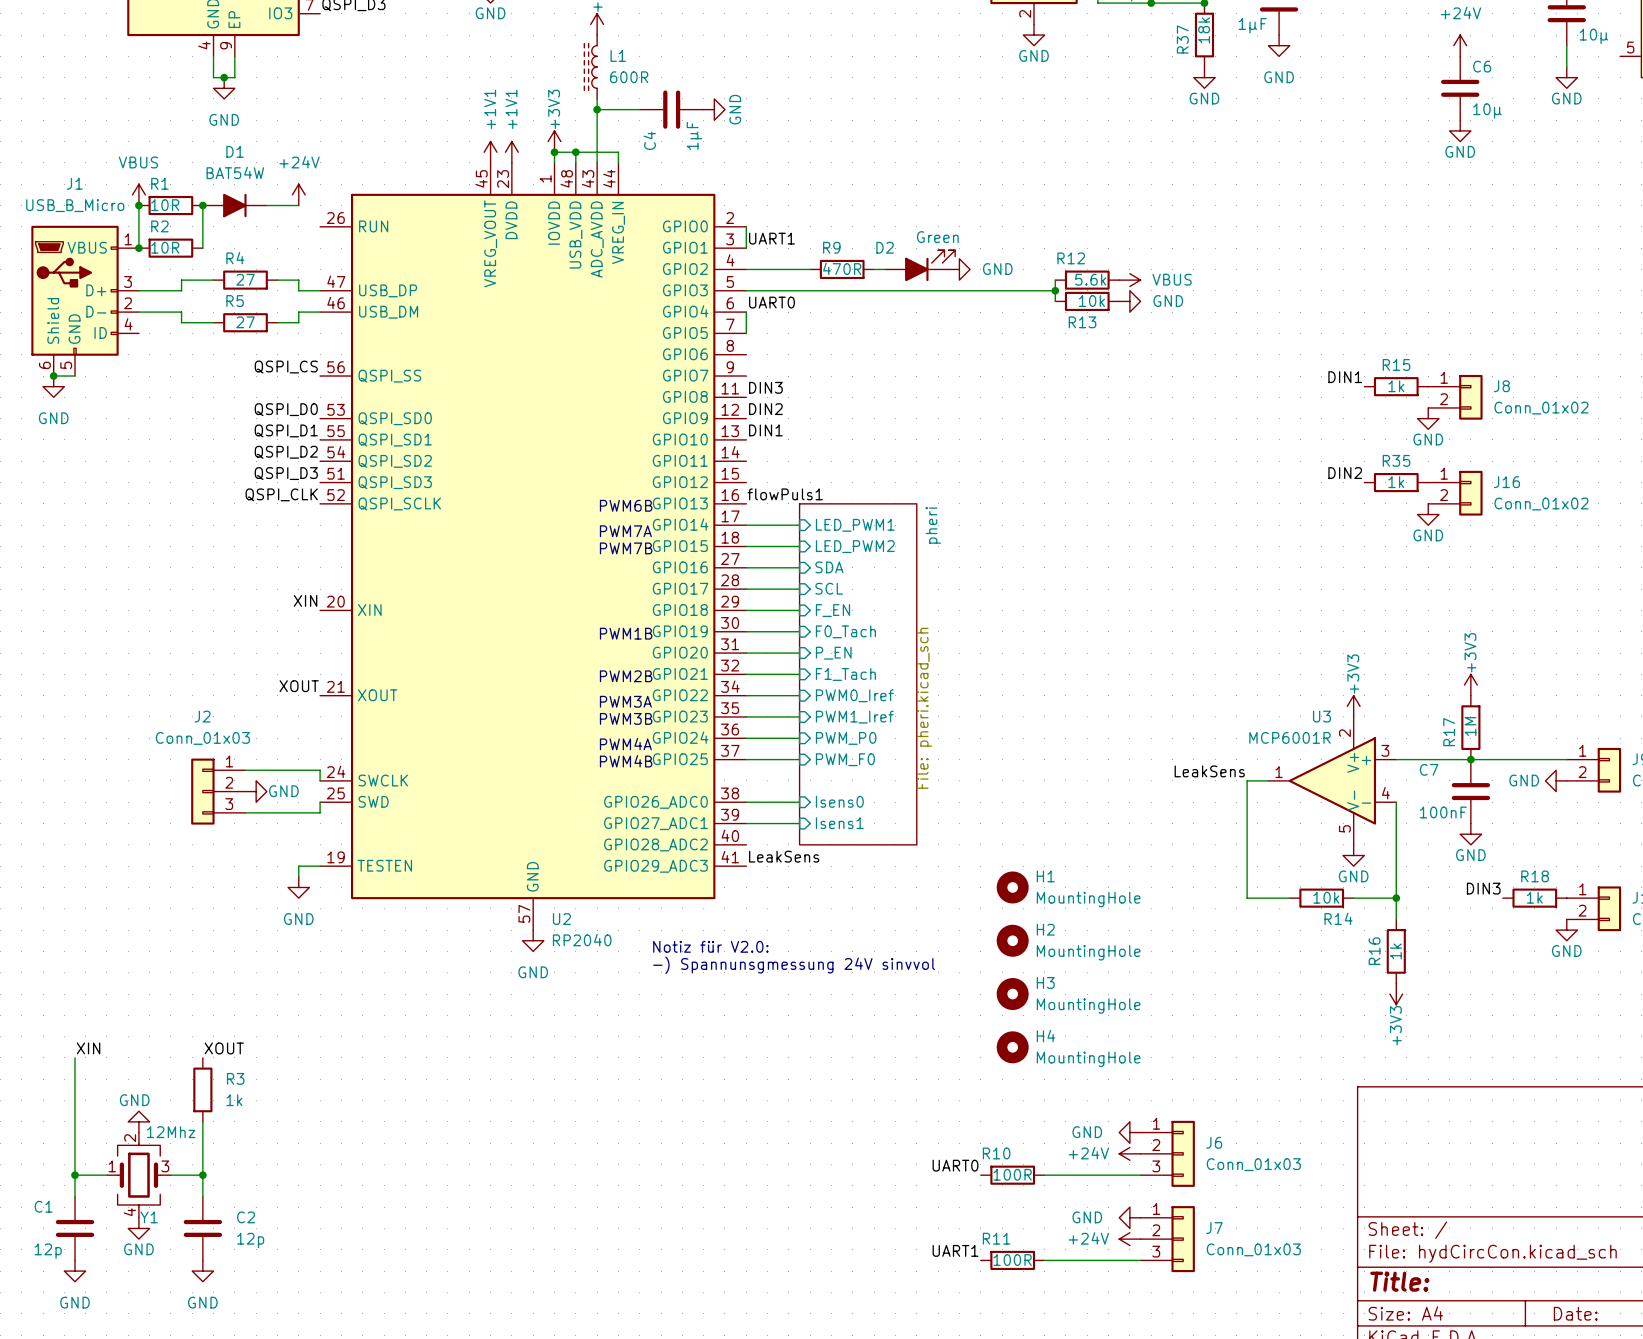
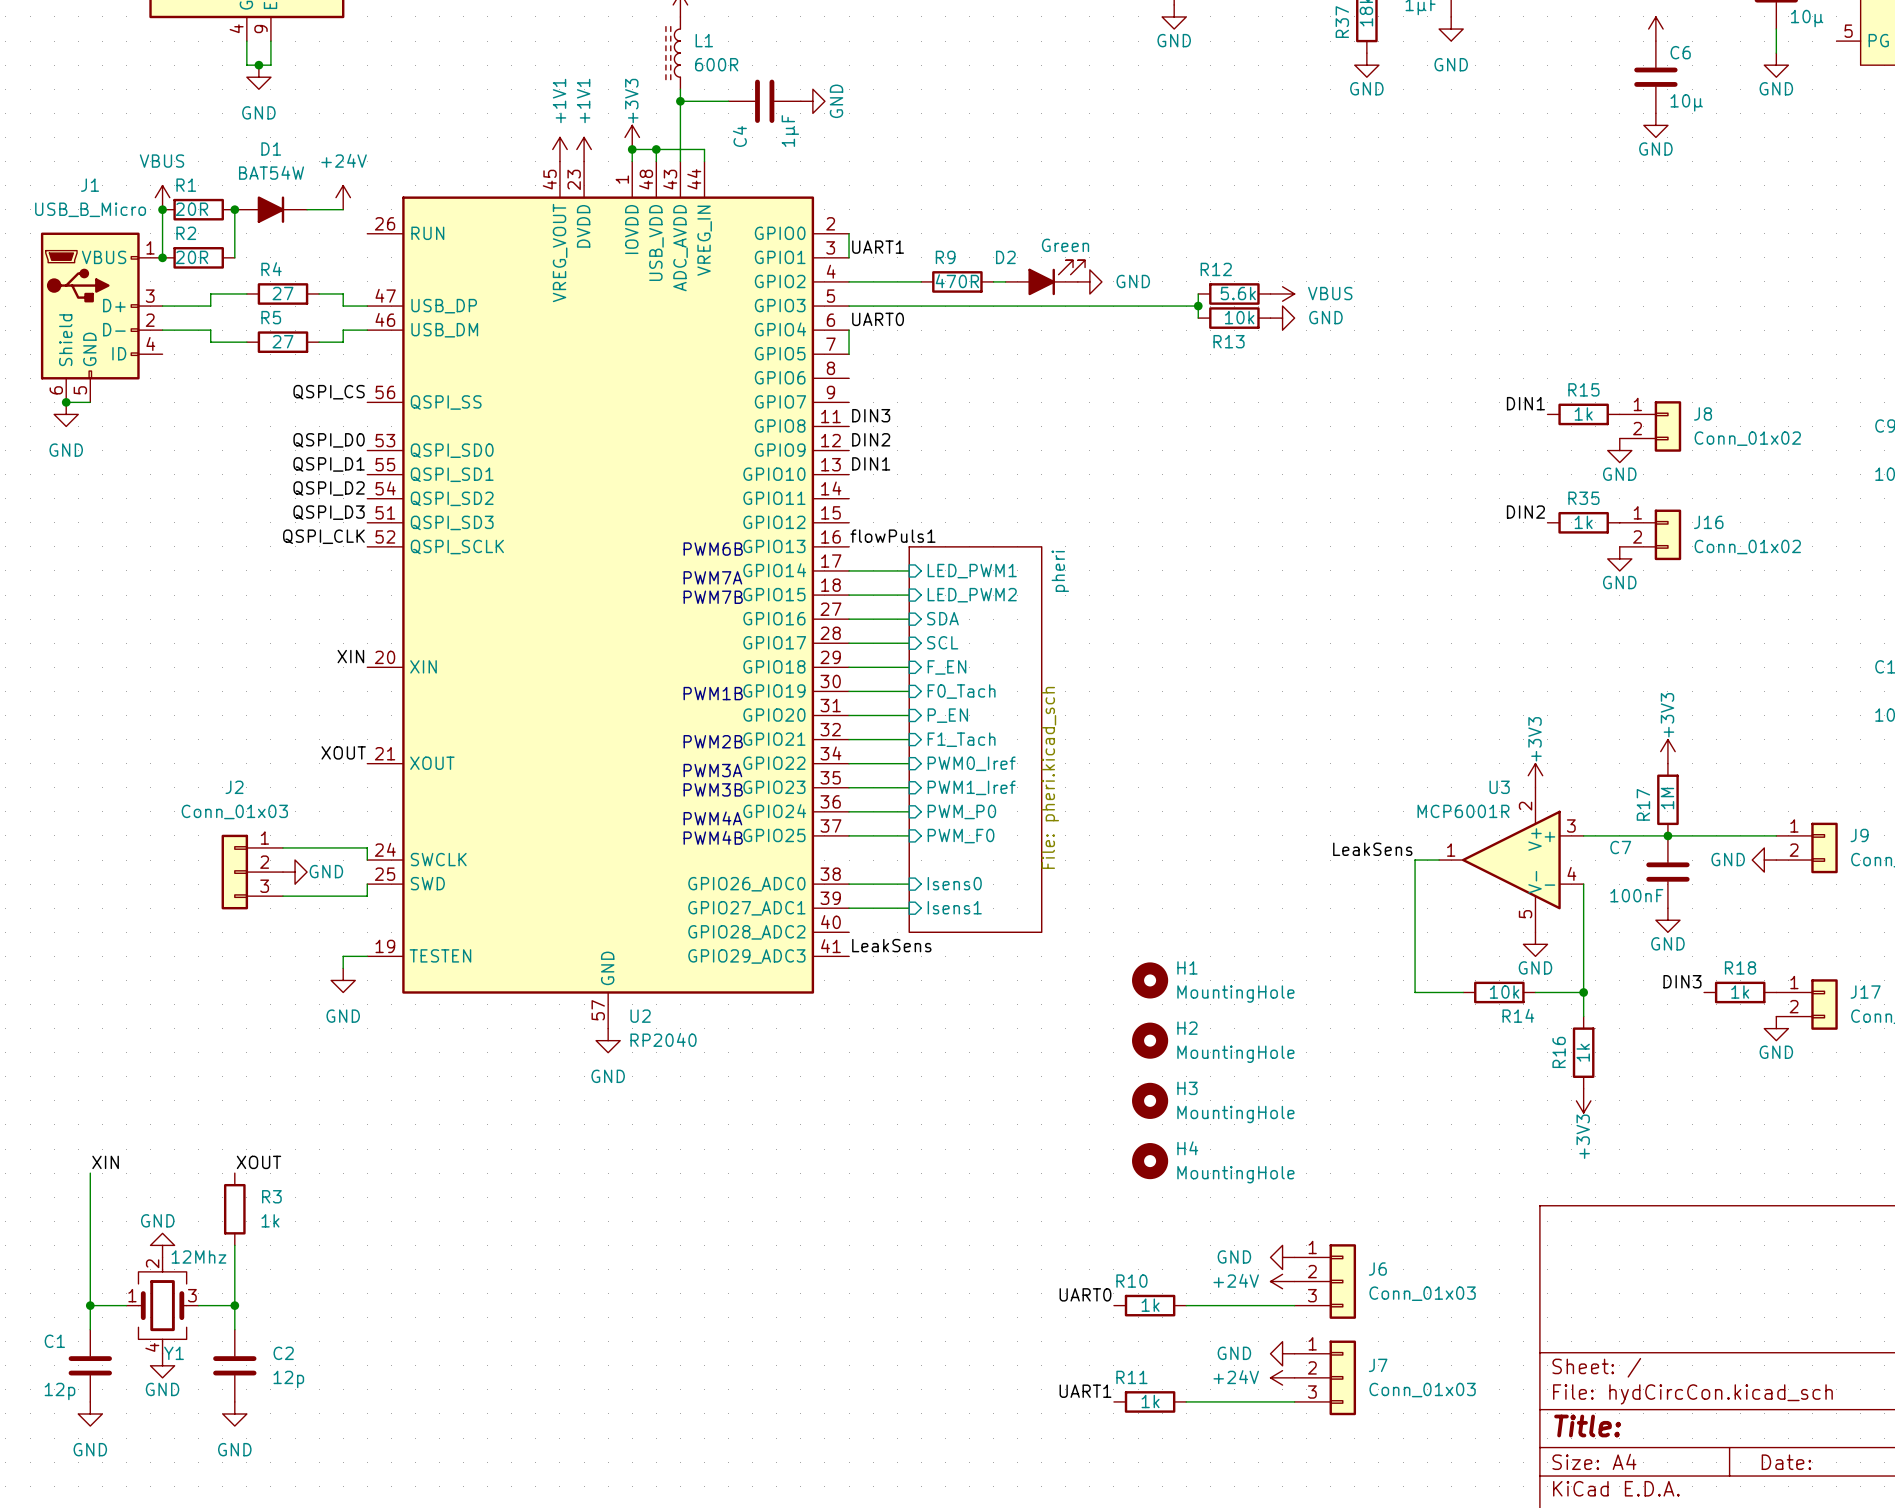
R1 value: 10R (165, 205) -> 20R (192, 209)
R2 value: 10R (165, 247) -> 20R (192, 257)
text: Notiz für V2.0: (710, 946) -> none
text: -) Spannunsgmessung 24V sinvvol (794, 965) -> none
R10 value: 100R (1012, 1174) -> 1k (1150, 1305)
R11 value: 100R (1012, 1260) -> 1k (1150, 1401)

